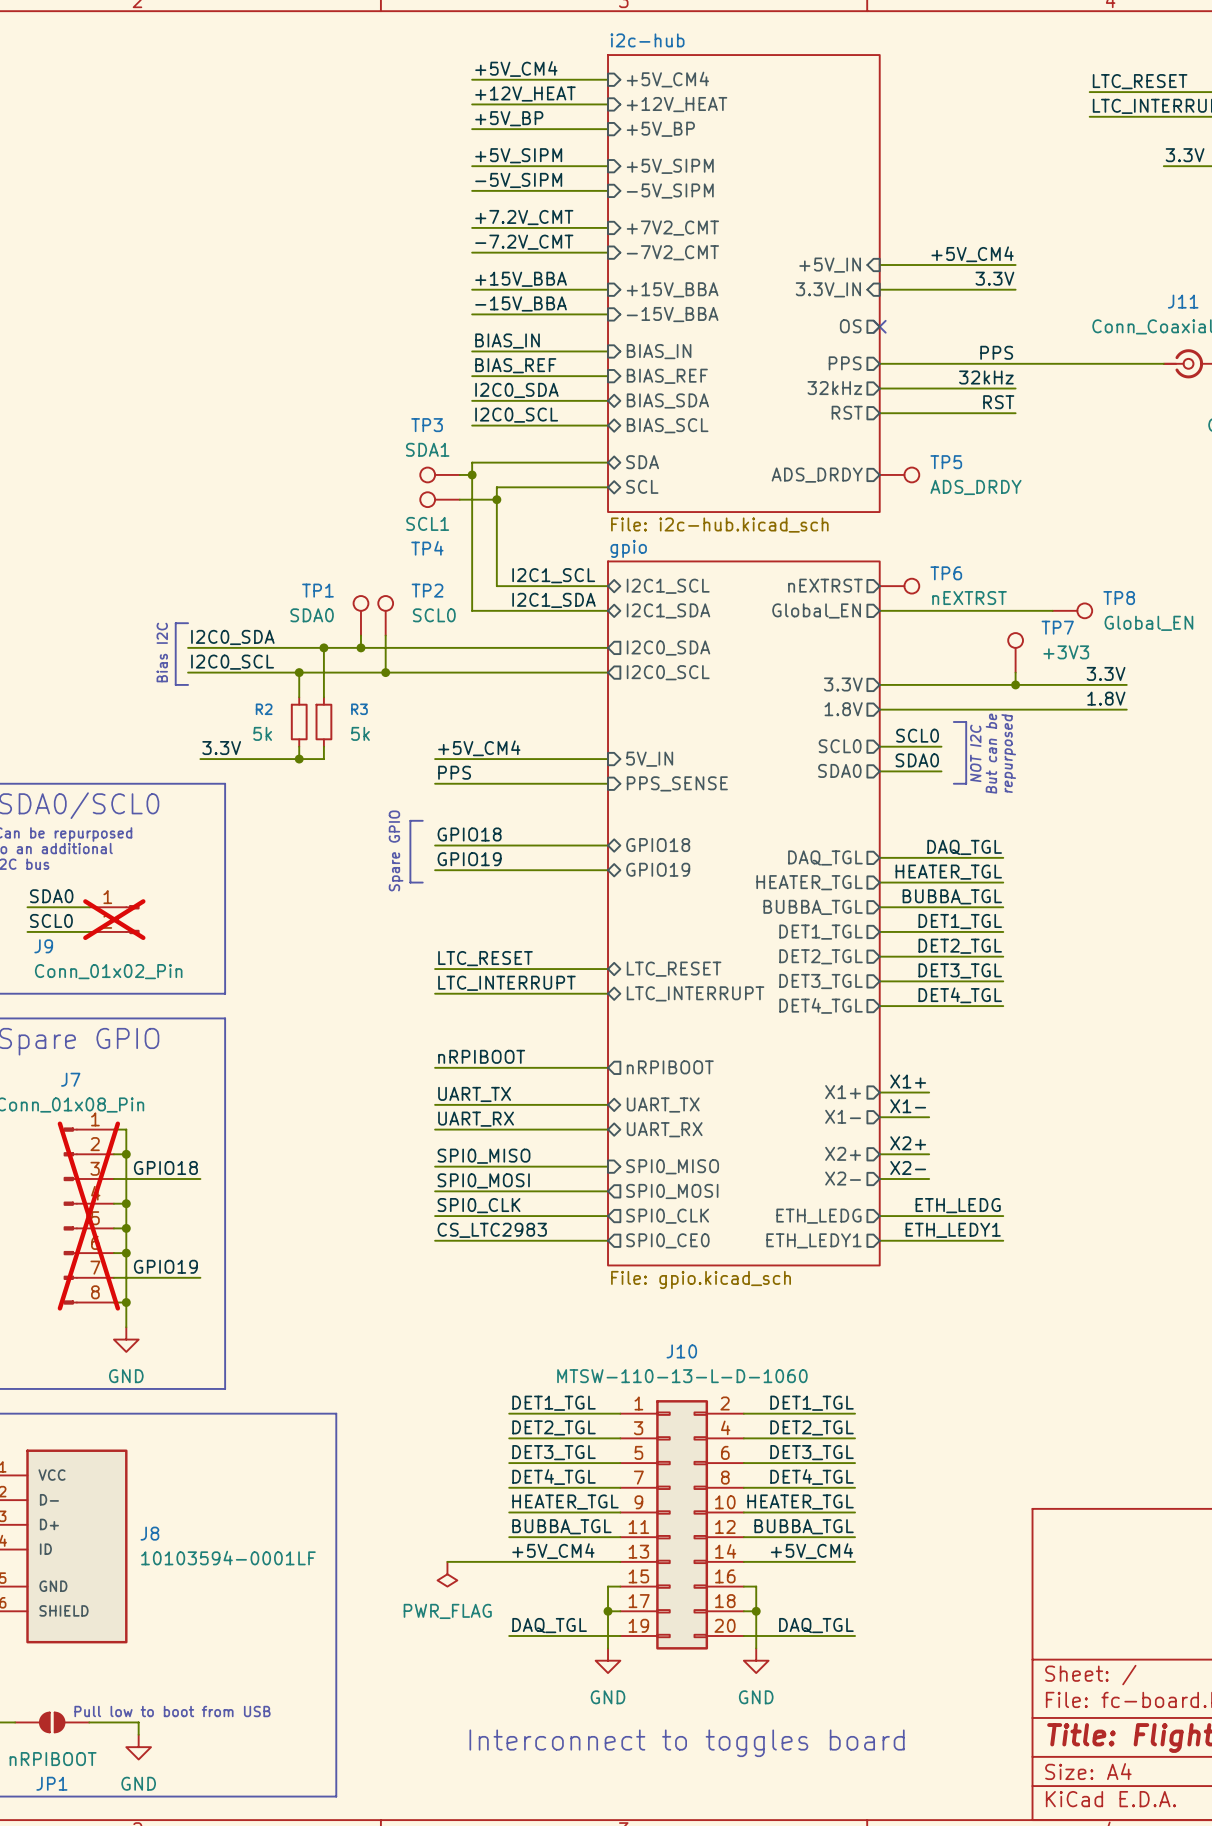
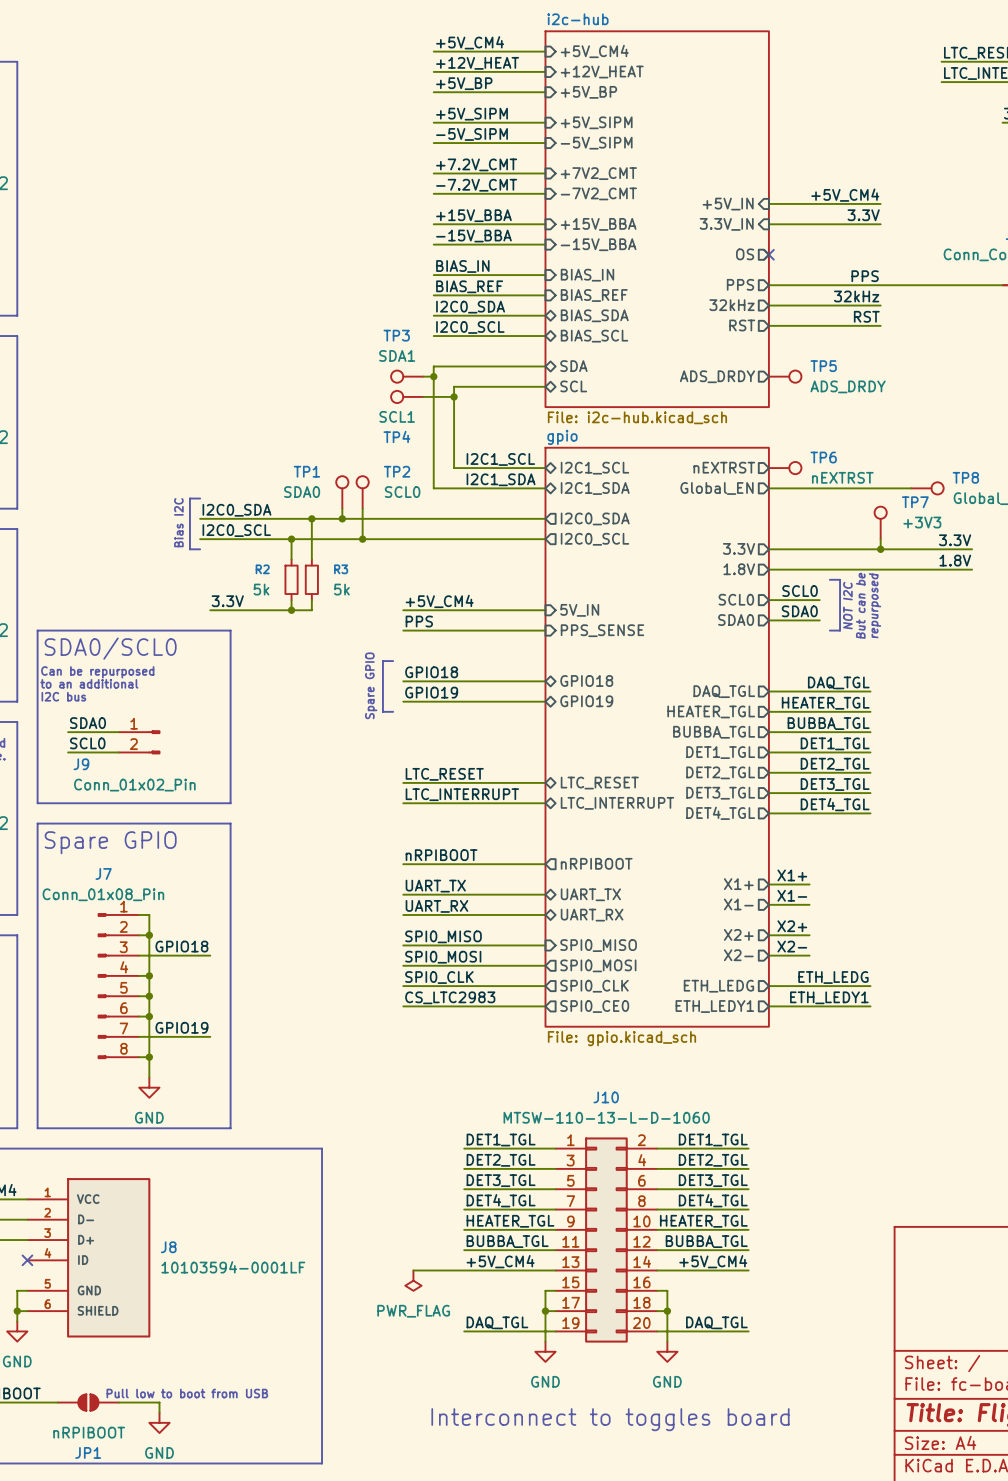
J9 do-not-place cross: (114, 919) -> none
J7 do-not-place cross: (88, 1216) -> none

